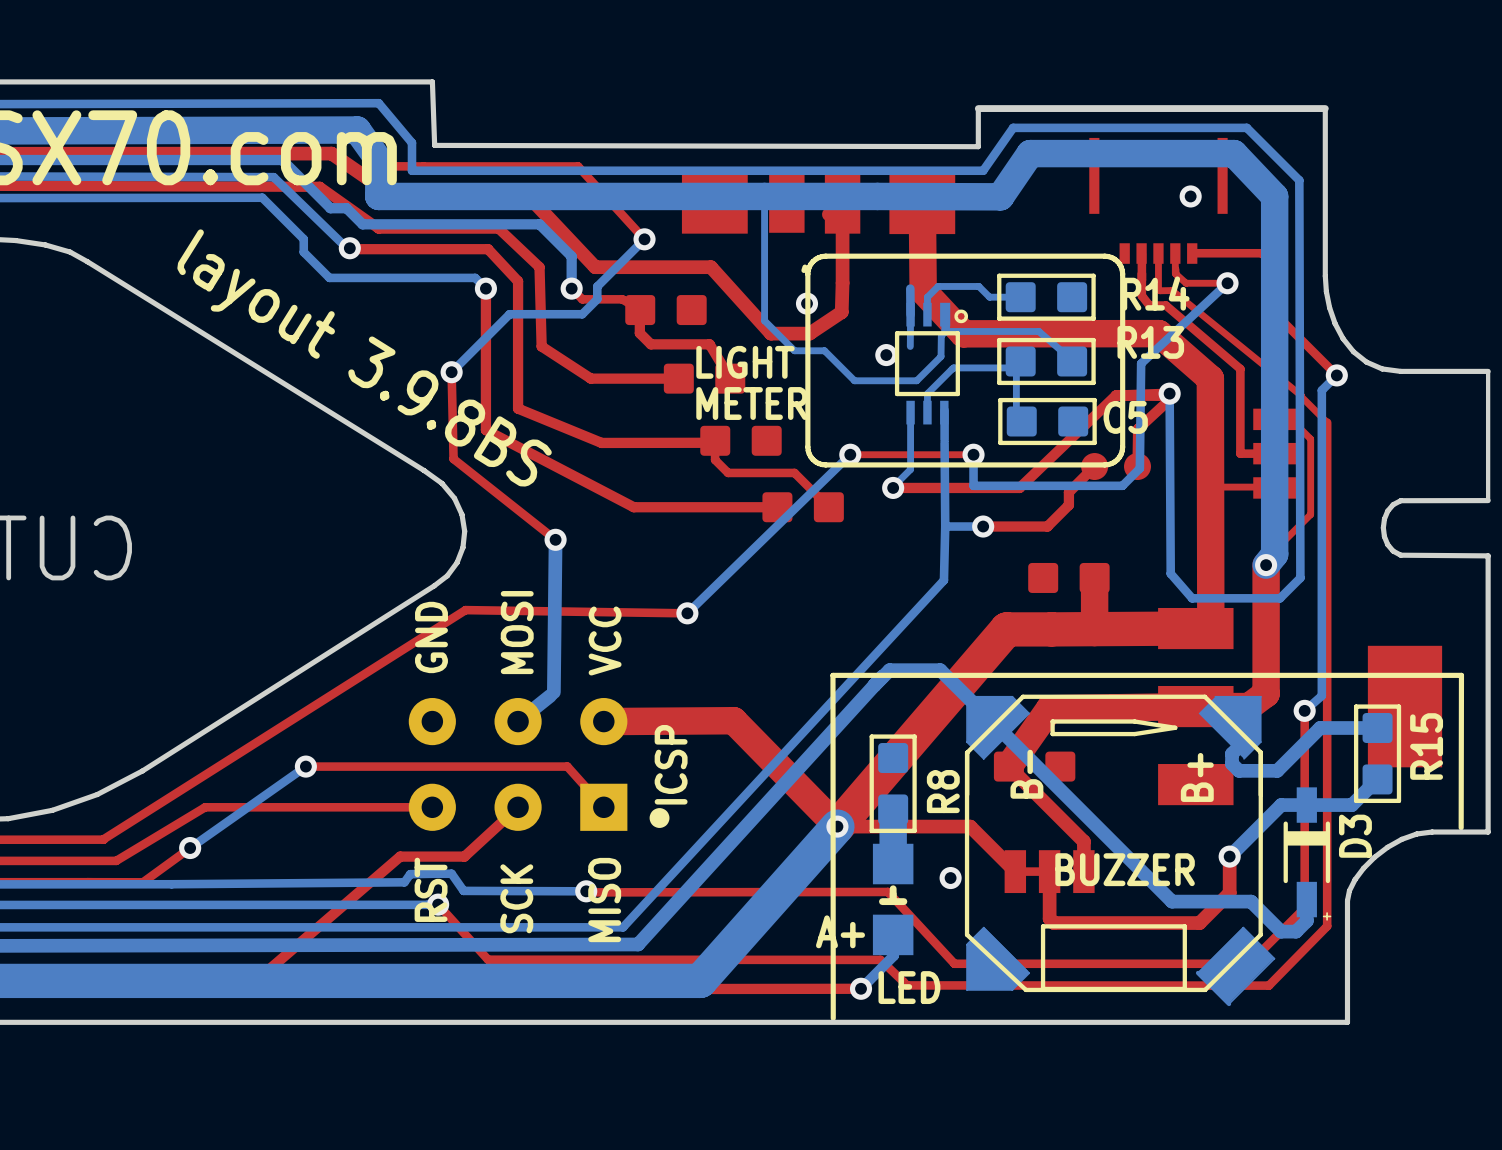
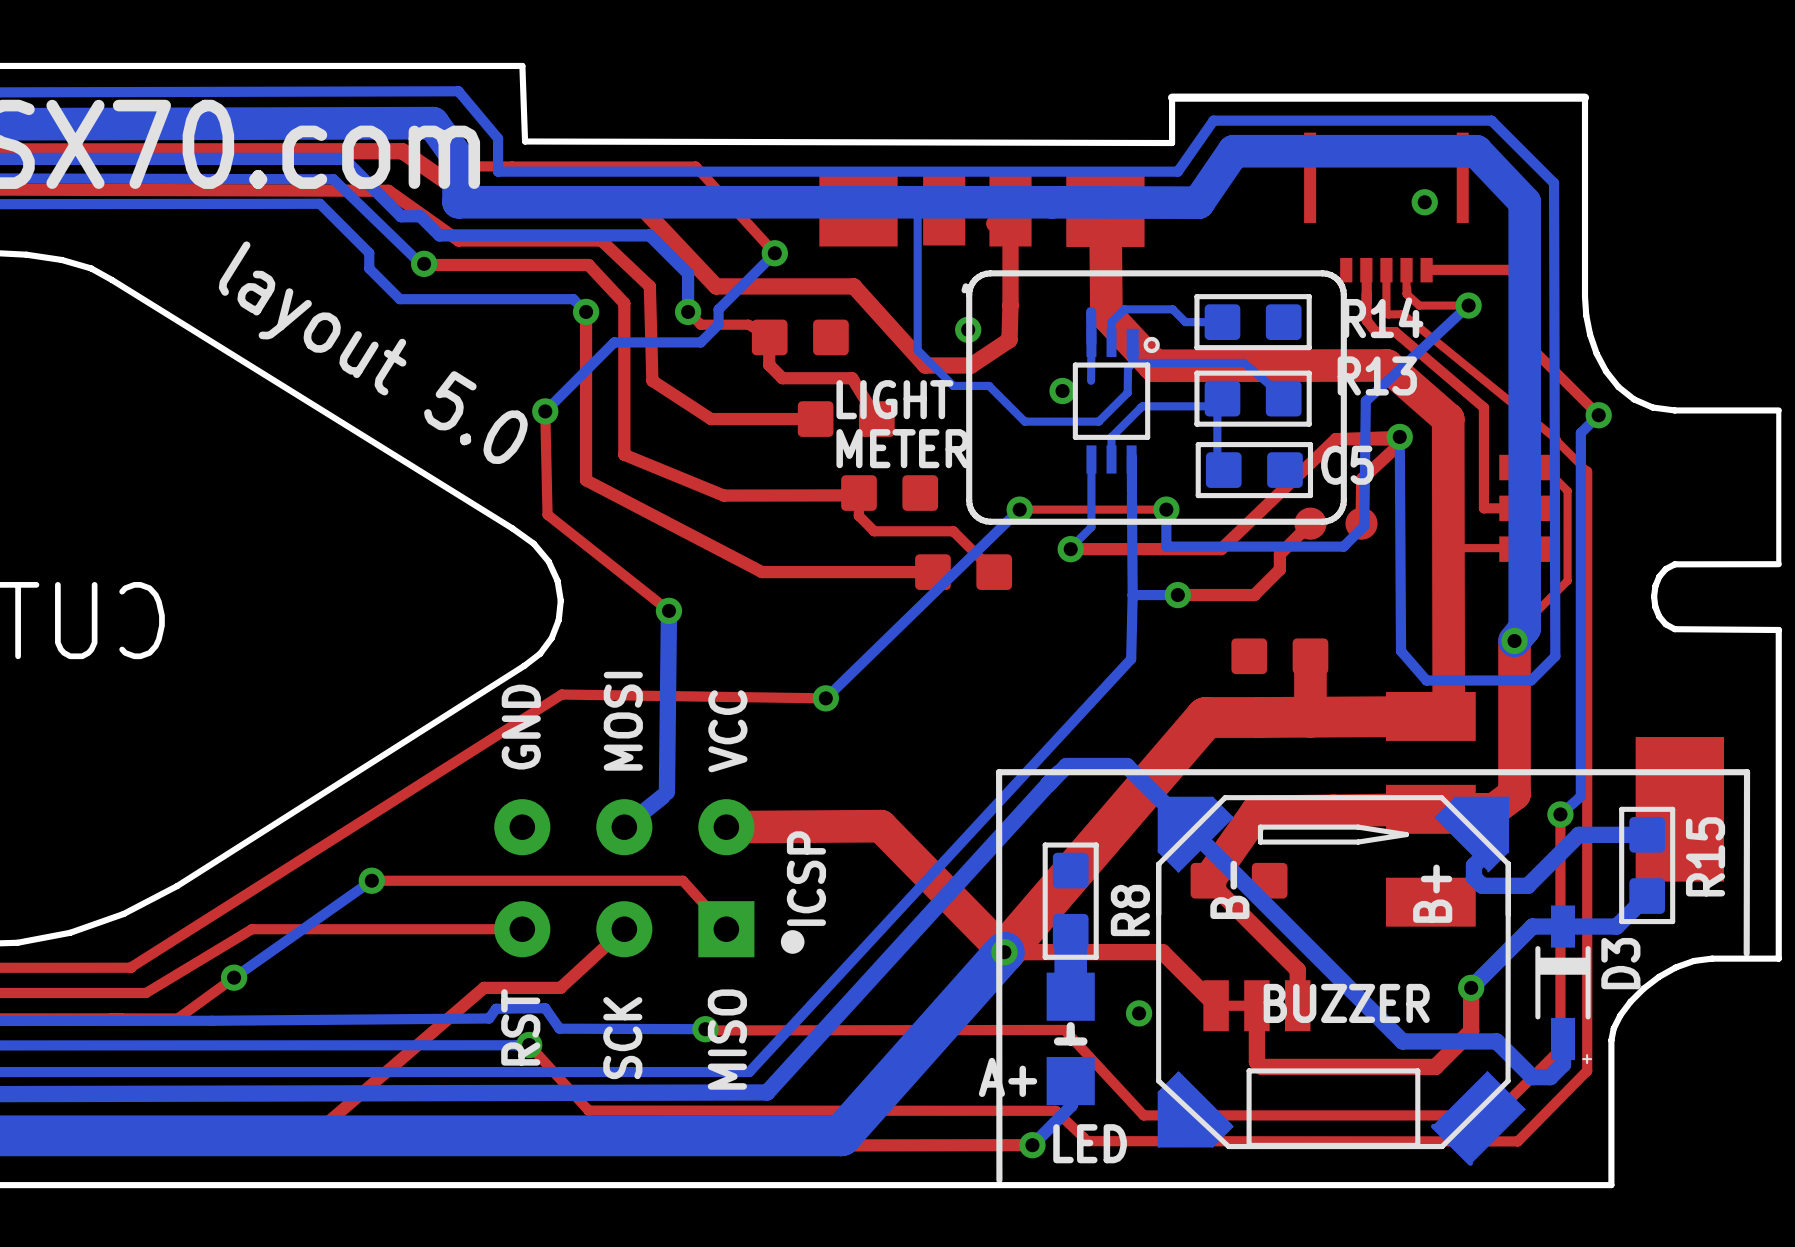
text: layout 3.9.8BS (364, 357) -> layout 5.0 (373, 352)

